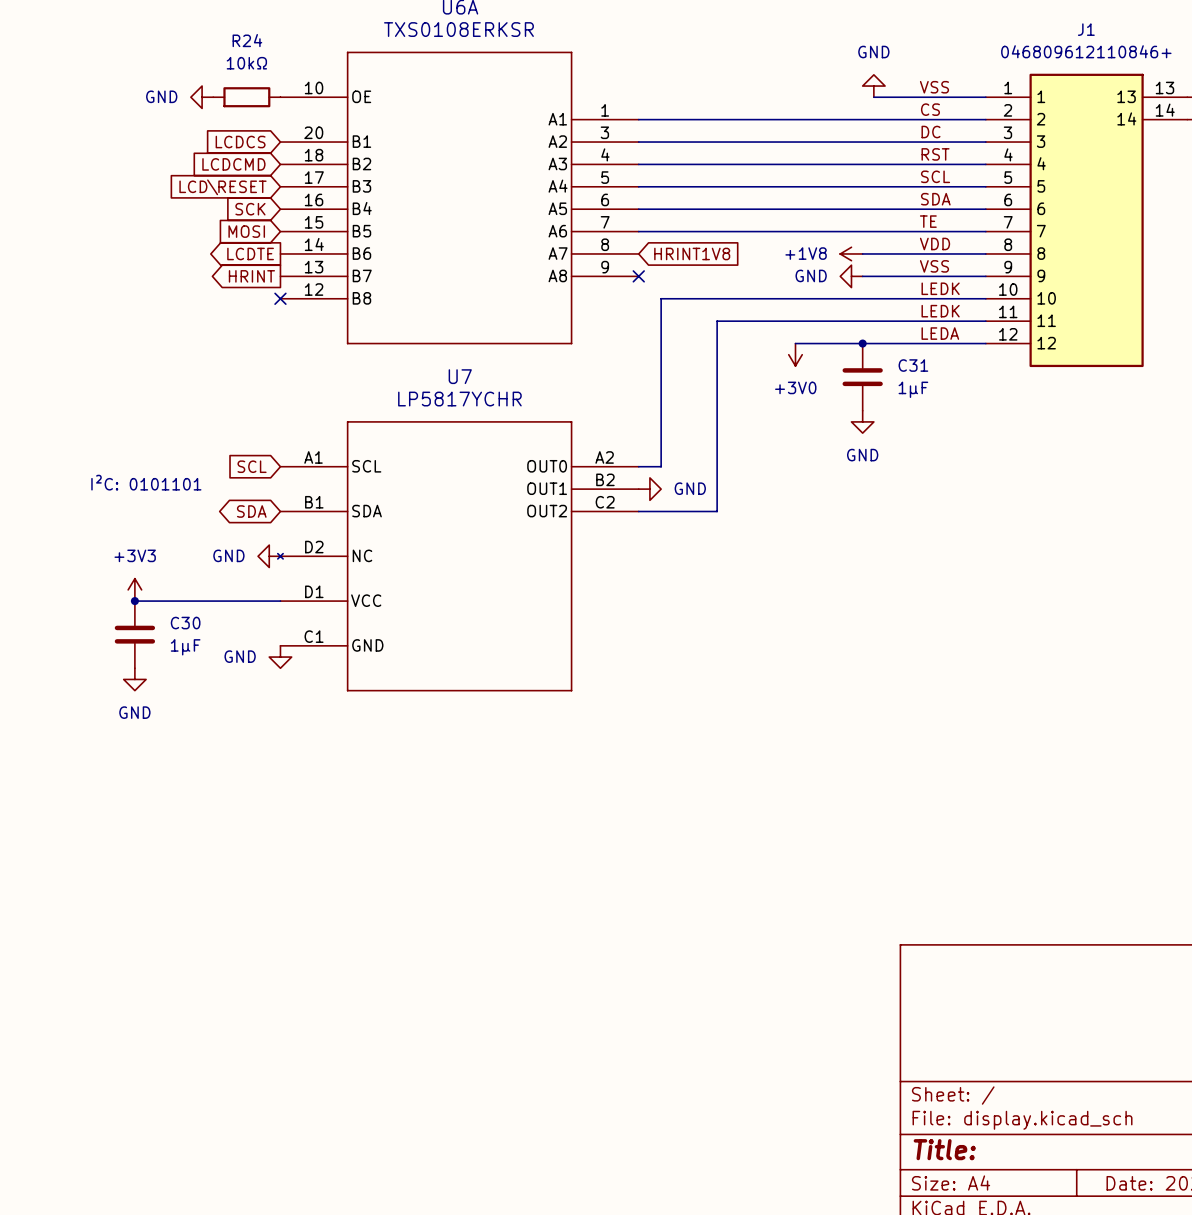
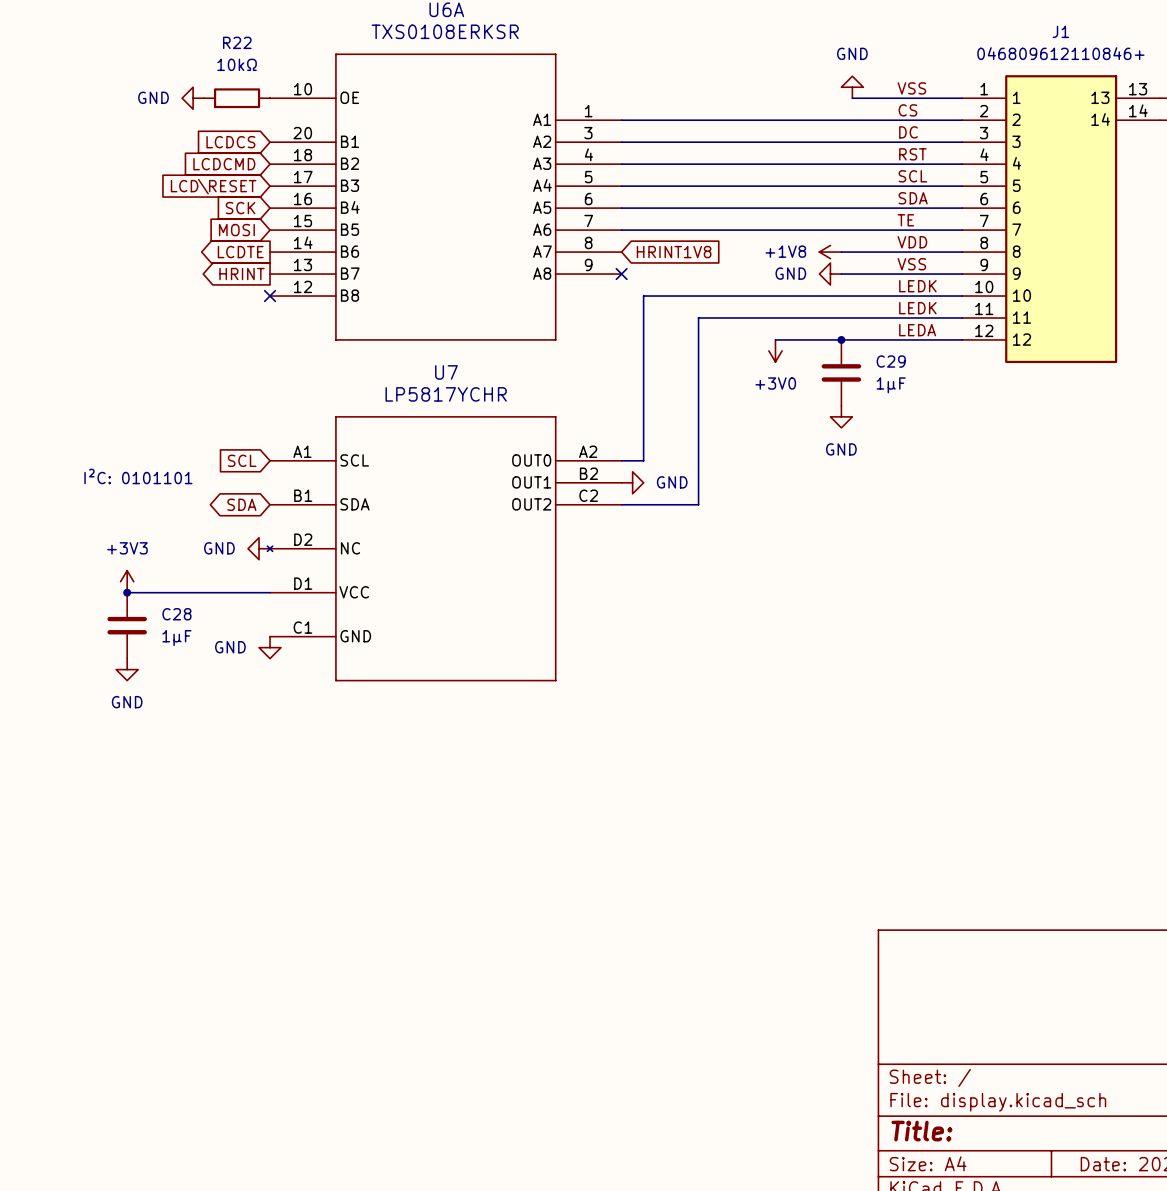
R24 name: R24 (247, 40) -> R22 (237, 42)
C31 name: C31 (913, 365) -> C29 (891, 361)
C30 name: C30 (185, 623) -> C28 (176, 614)

